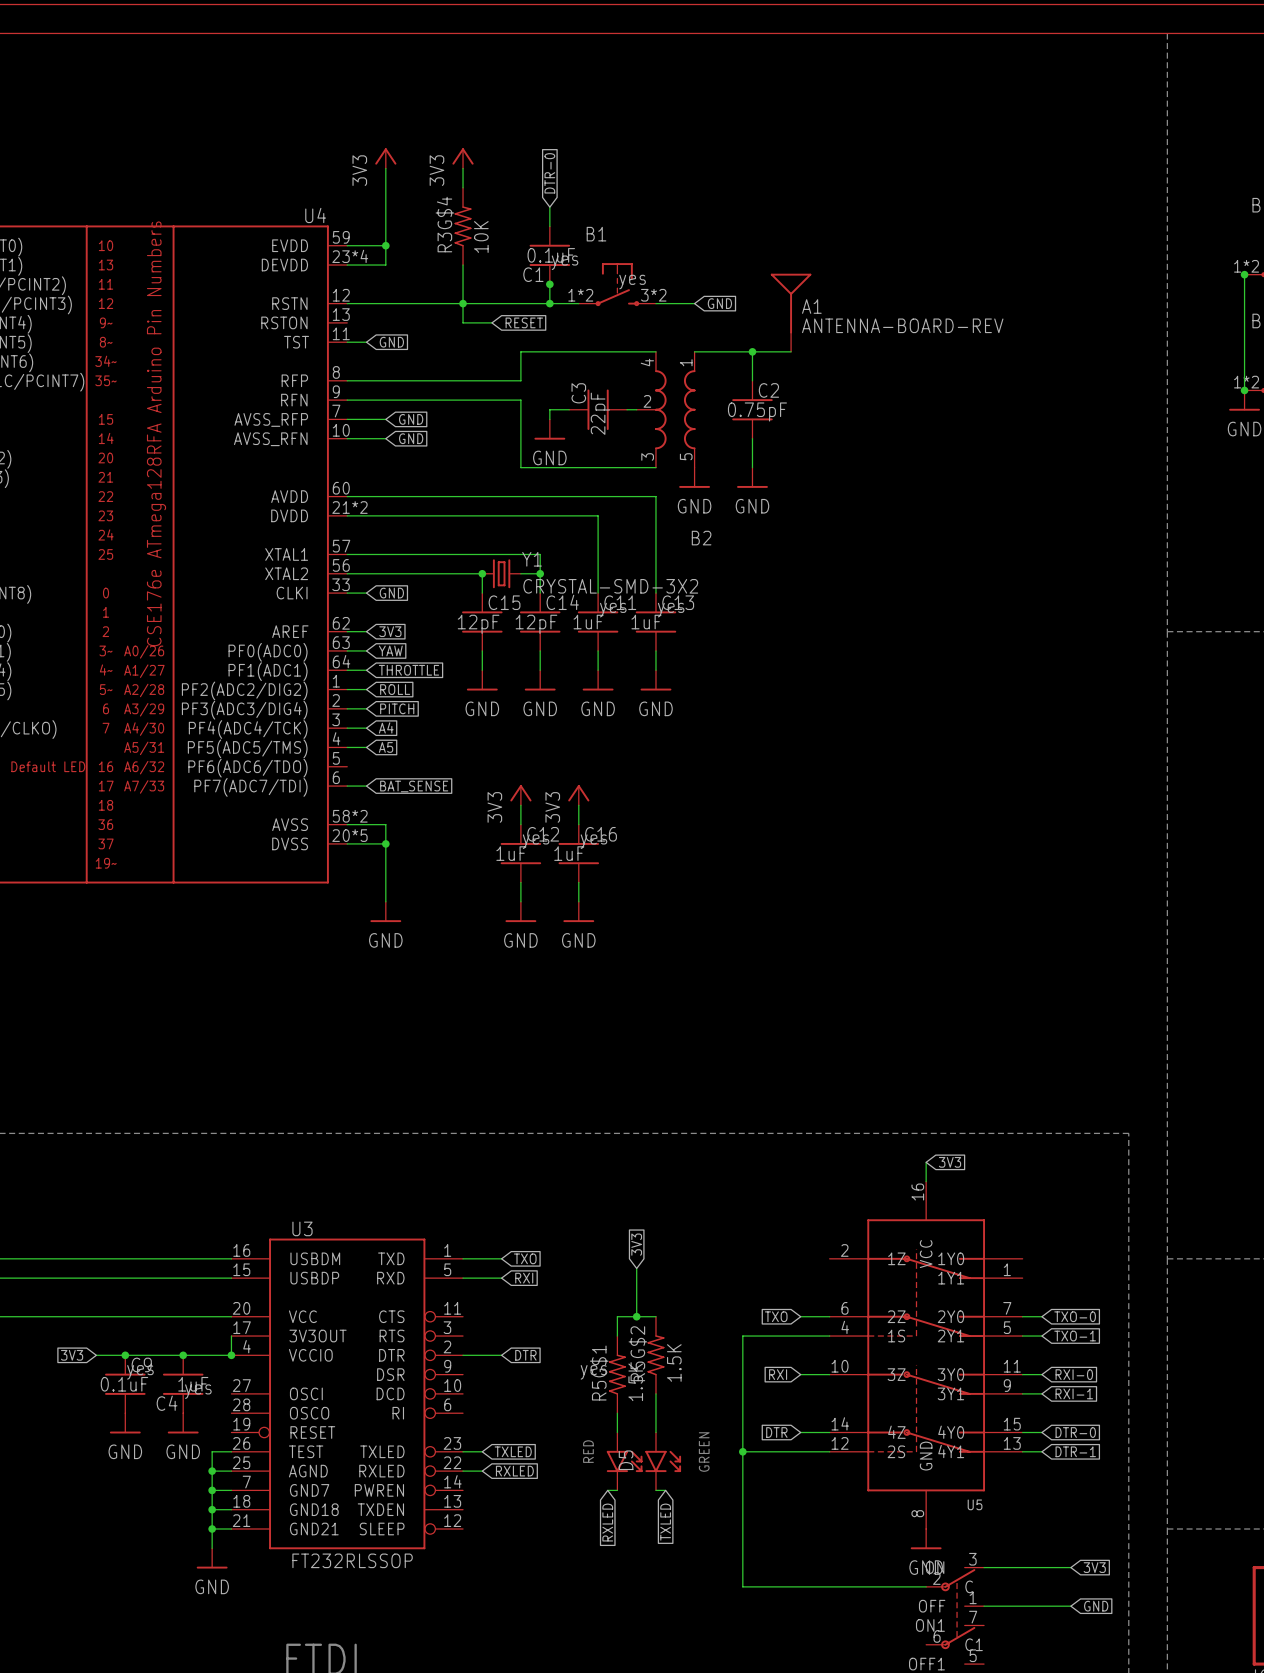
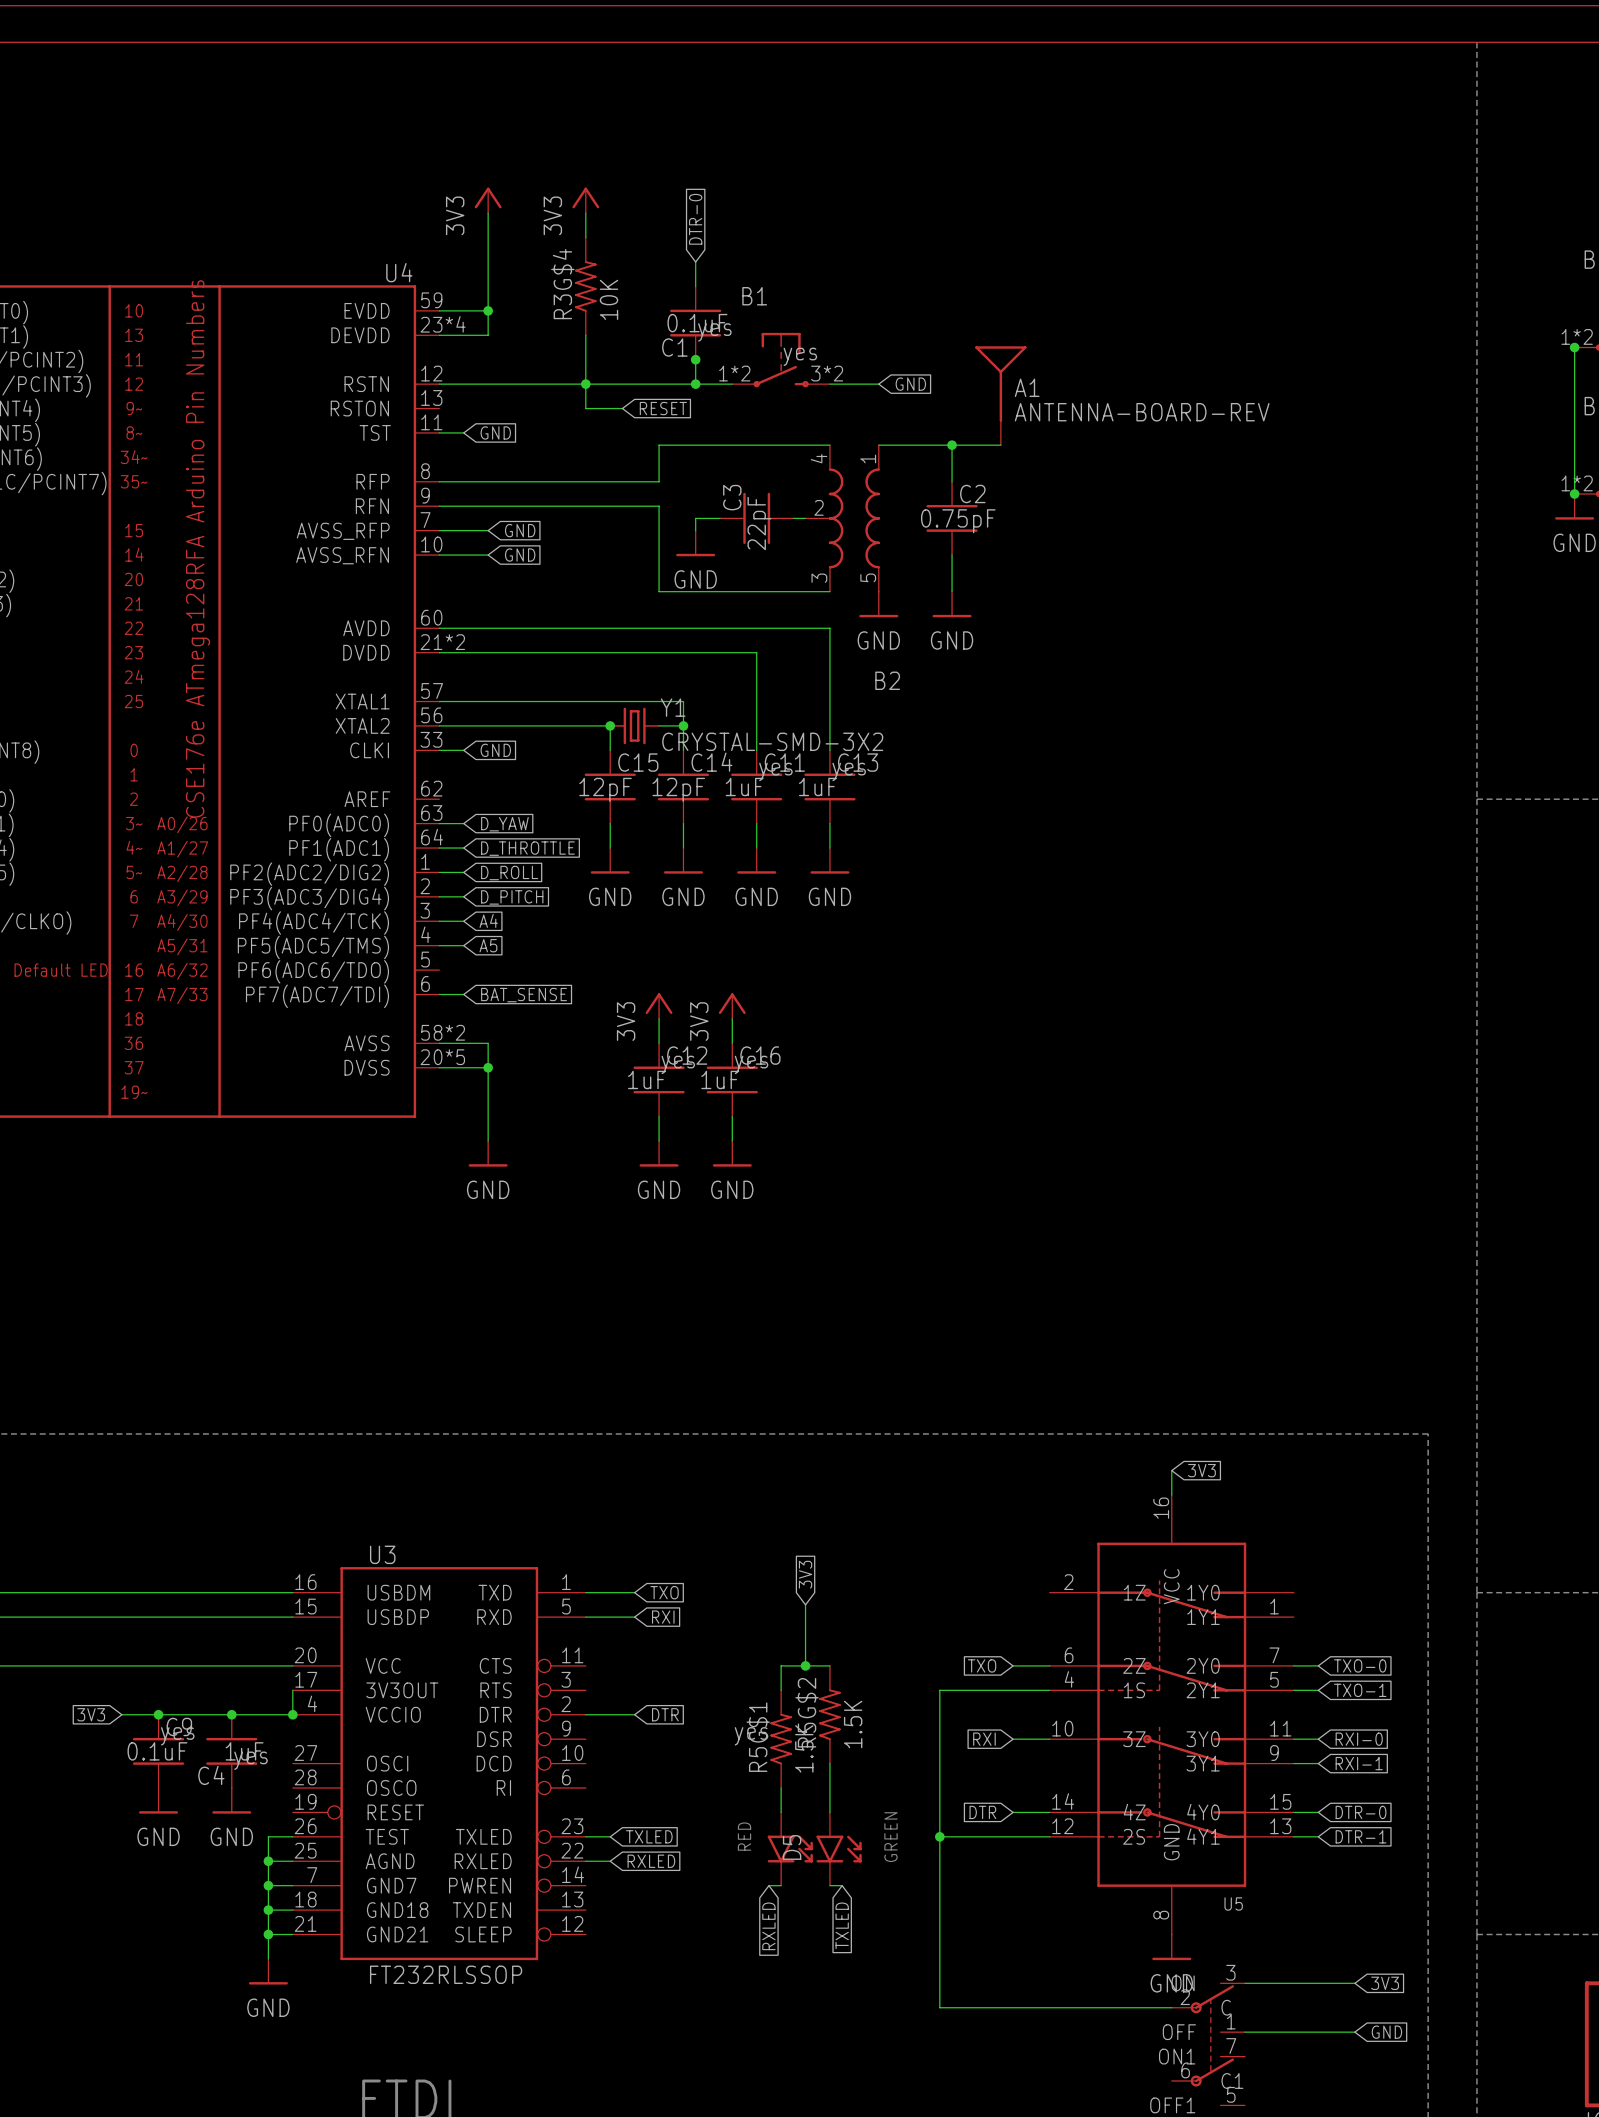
wire: (347, 631) (366, 631) -> none
global label: 3V3 (390, 631) -> none
global label: YAW (390, 650) -> D_YAW (504, 824)
global label: THROTTLE (409, 670) -> D_THROTTLE (527, 848)
global label: ROLL (395, 689) -> D_ROLL (509, 873)
global label: PITCH (397, 708) -> D_PITCH (512, 897)

